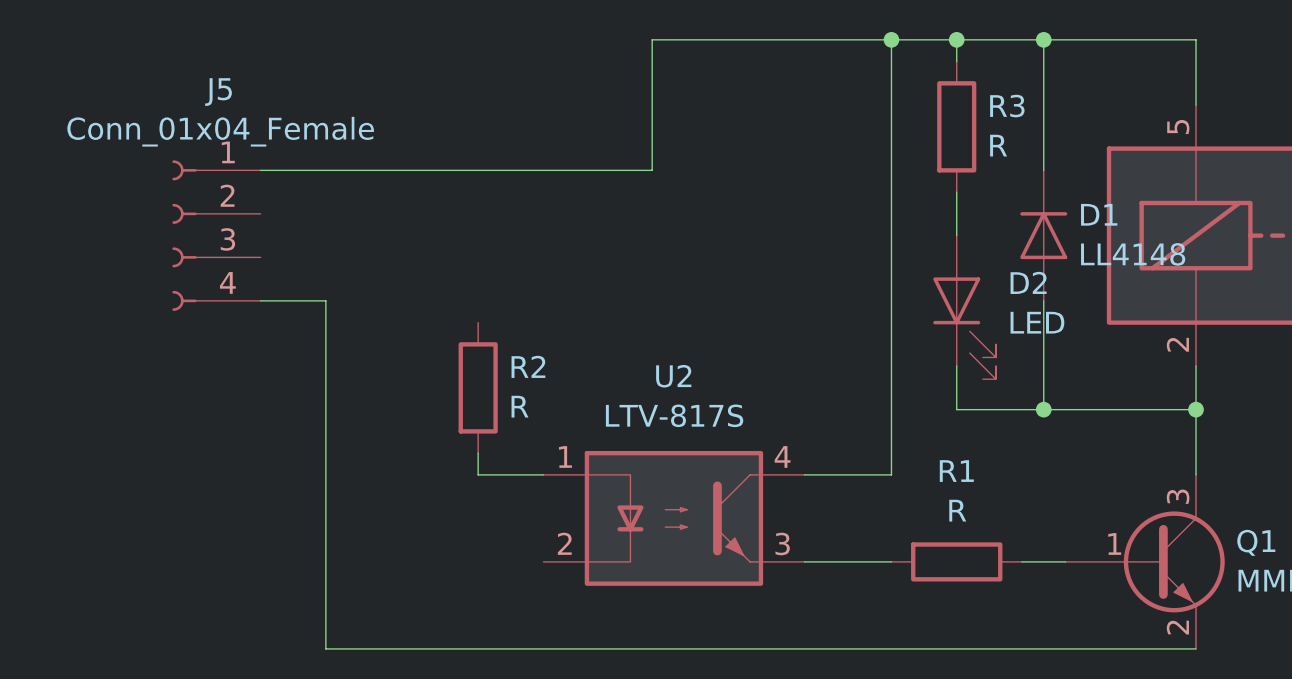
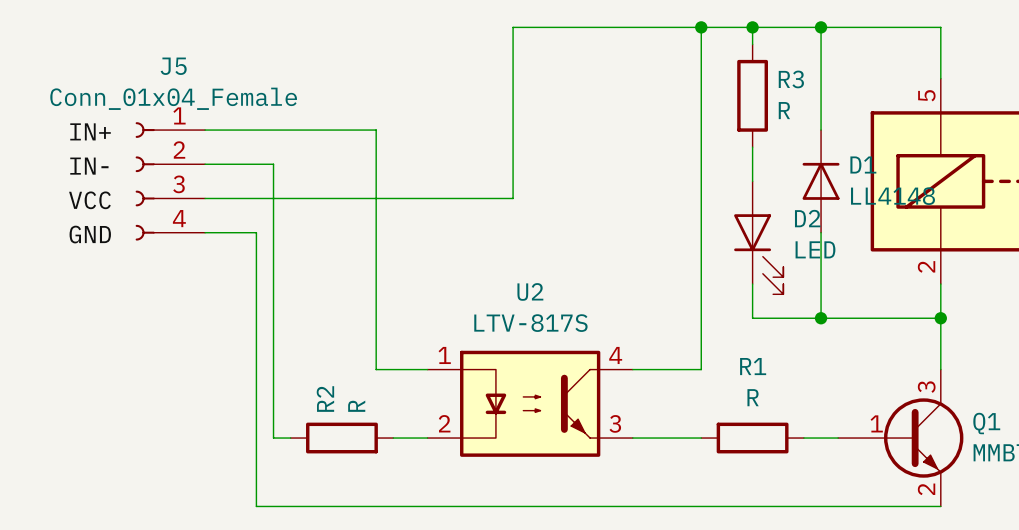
wire: (478, 170) (652, 170) -> (205, 198) (513, 198) (513, 130)
wire: none -> (376, 130) (376, 352)
label: none -> IN+ (90, 131)
wire: none -> (205, 164) (273, 164) (273, 438) (290, 438)
label: none -> IN- (89, 166)
label: none -> VCC (89, 200)
label: none -> GND (90, 234)
R2 name position: R2 (528, 366) -> R2 (325, 399)
R2 rotation: 0° (478, 387) -> 90° clockwise (341, 438)
R2 position: (478, 387) -> (341, 438)
R2 value position: R (520, 406) -> R (356, 406)
wire: none -> (393, 438) (427, 438)

